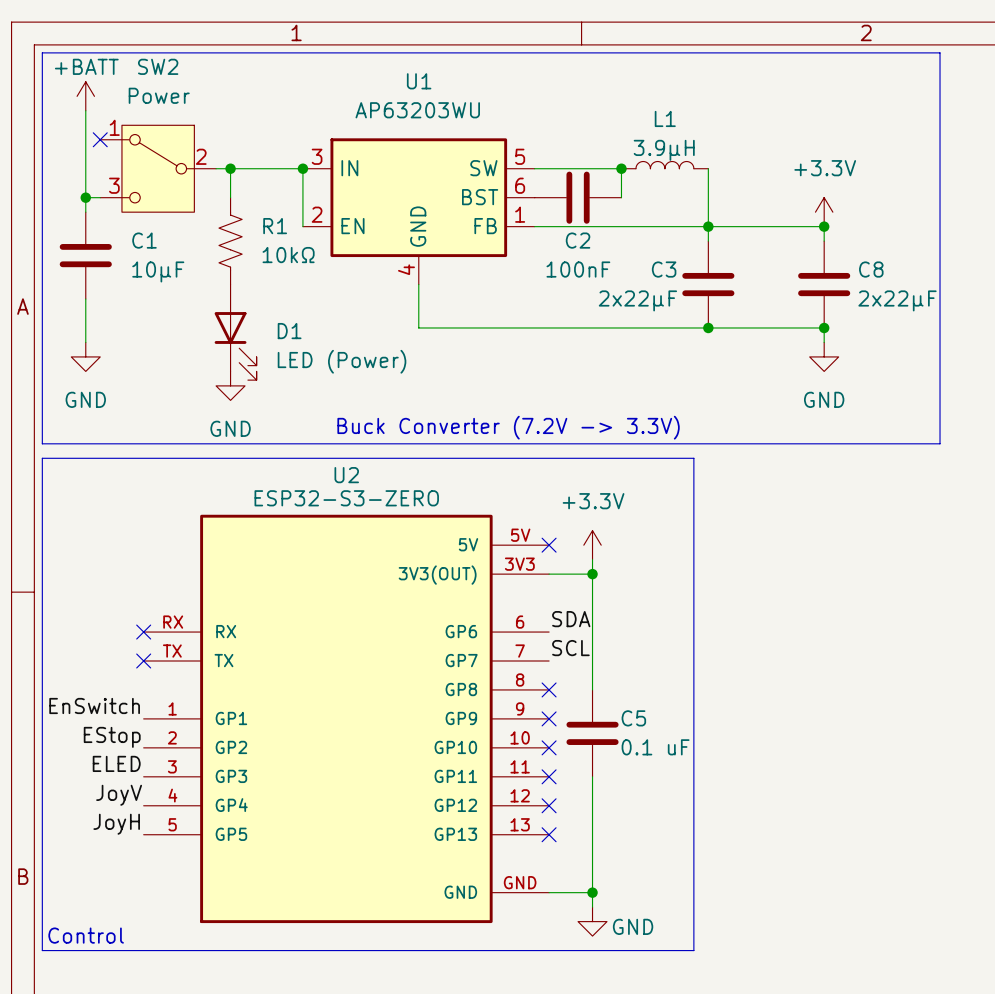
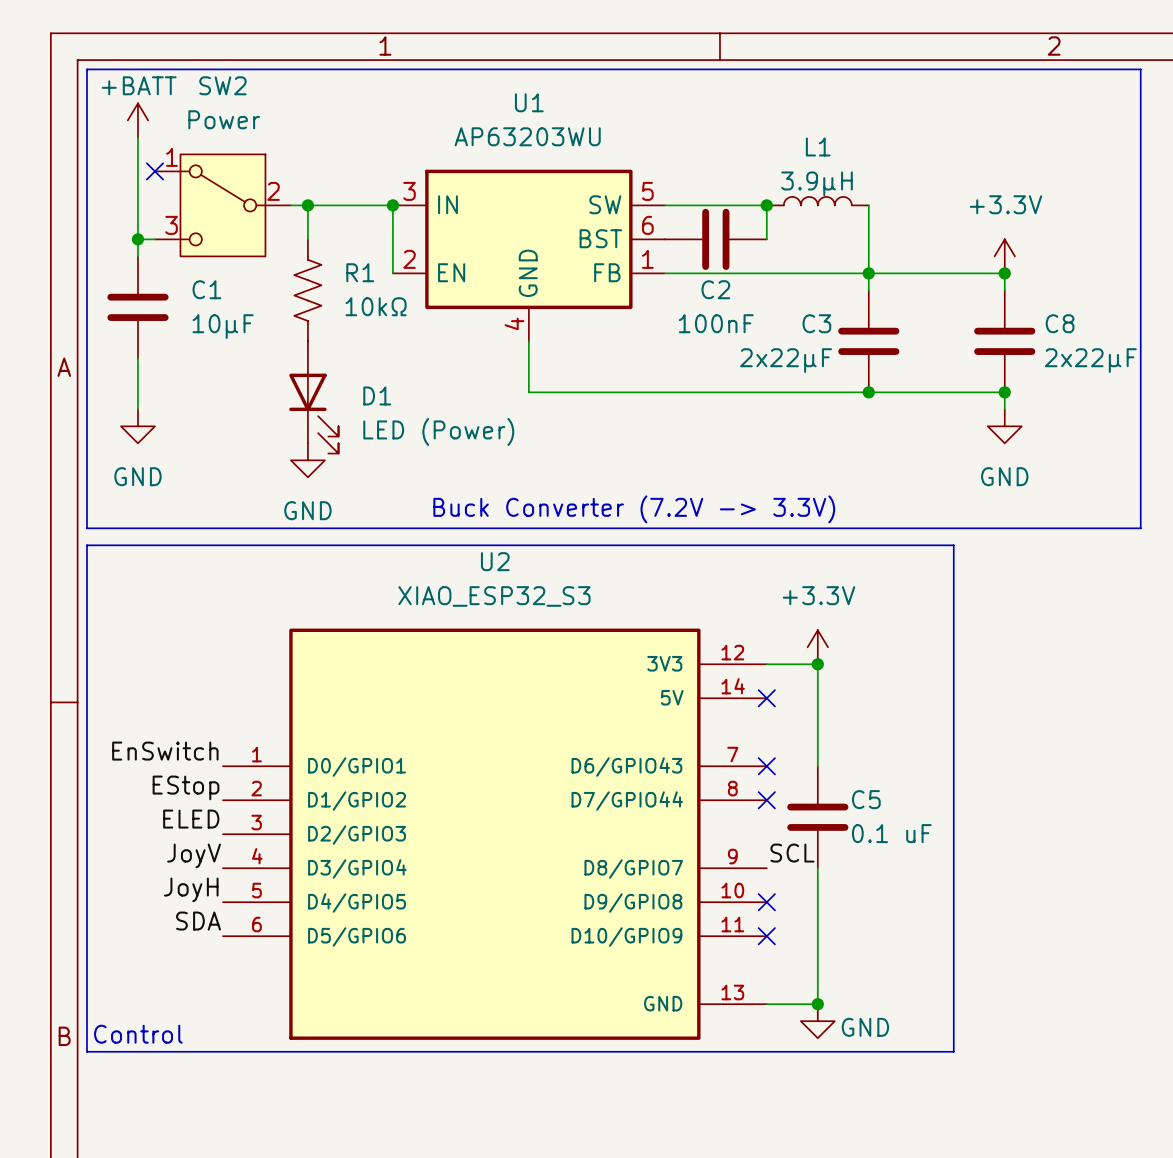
line: (693, 458) (693, 950) (42, 950) (42, 889) -> (851, 545) (953, 545) (953, 1051) (86, 1051)
U2 value: ESP32-S3-ZERO (346, 498) -> XIAO_ESP32_S3 (494, 596)
U2 symbol: [143, 514, 550, 924] -> [222, 628, 767, 1040]
no-connect mark: (549, 545) -> none
power symbol position: +3.3V (592, 545) -> +3.3V (817, 647)
wire: (592, 559) (592, 689) -> none
wire: none -> (766, 664) (817, 664) (817, 766)
junction: none -> (817, 664)
wire: (549, 574) (592, 574) -> none
junction: (592, 574) -> none
no-connect mark: none -> (766, 698)
label: SDA (571, 619) -> none
no-connect mark: (143, 632) -> none
no-connect mark: none -> (766, 766)
label position: SCL (570, 648) -> SCL (792, 853)
no-connect mark: (143, 661) -> none
no-connect mark: none -> (766, 800)
no-connect mark: (549, 689) -> none
label position: EnSwitch (94, 705) -> EnSwitch (165, 751)
no-connect mark: (549, 718) -> none
C5 position: (592, 733) -> (817, 817)
wire: none -> (817, 868) (817, 1004) (766, 1004)
label position: EStop (112, 737) -> EStop (186, 787)
no-connect mark: (549, 747) -> none
no-connect mark: none -> (766, 902)
label position: ELED (116, 763) -> ELED (191, 819)
no-connect mark: (549, 776) -> none
wire: (592, 776) (592, 907) -> none
label: none -> SDA (198, 921)
no-connect mark: none -> (766, 936)
label position: JoyV (119, 795) -> JoyV (194, 855)
no-connect mark: (549, 805) -> none
label position: JoyH (116, 824) -> JoyH (191, 889)
no-connect mark: (549, 834) -> none
junction: none -> (817, 1004)
wire: (549, 892) (592, 892) -> none
junction: (592, 892) -> none
power symbol position: GND (592, 921) -> GND (817, 1021)
text position: Control (86, 935) -> Control (138, 1034)

